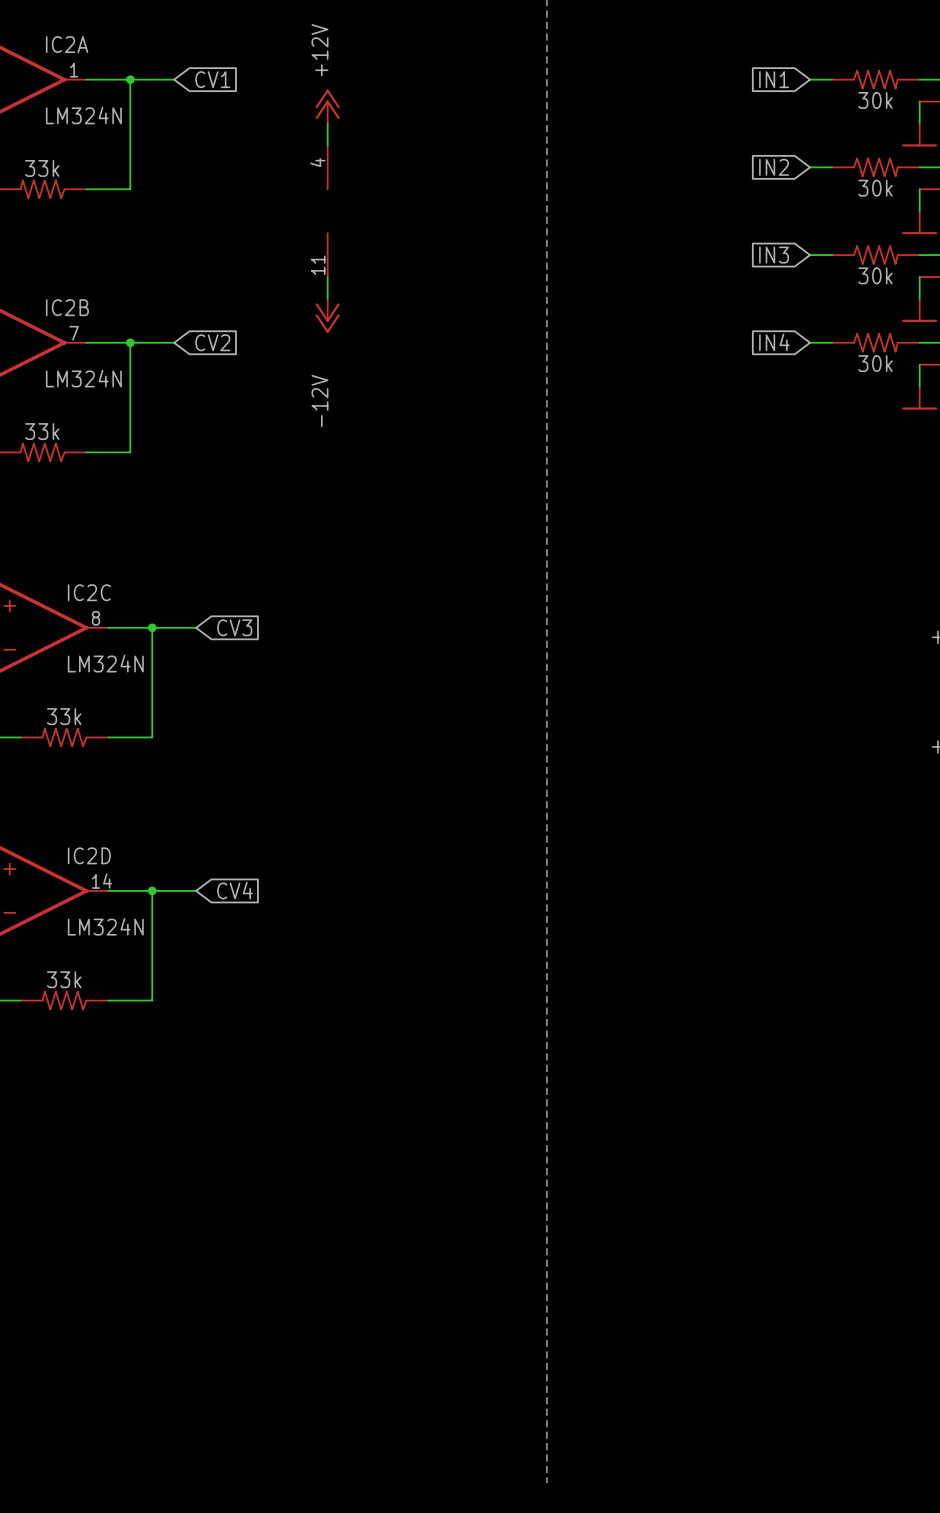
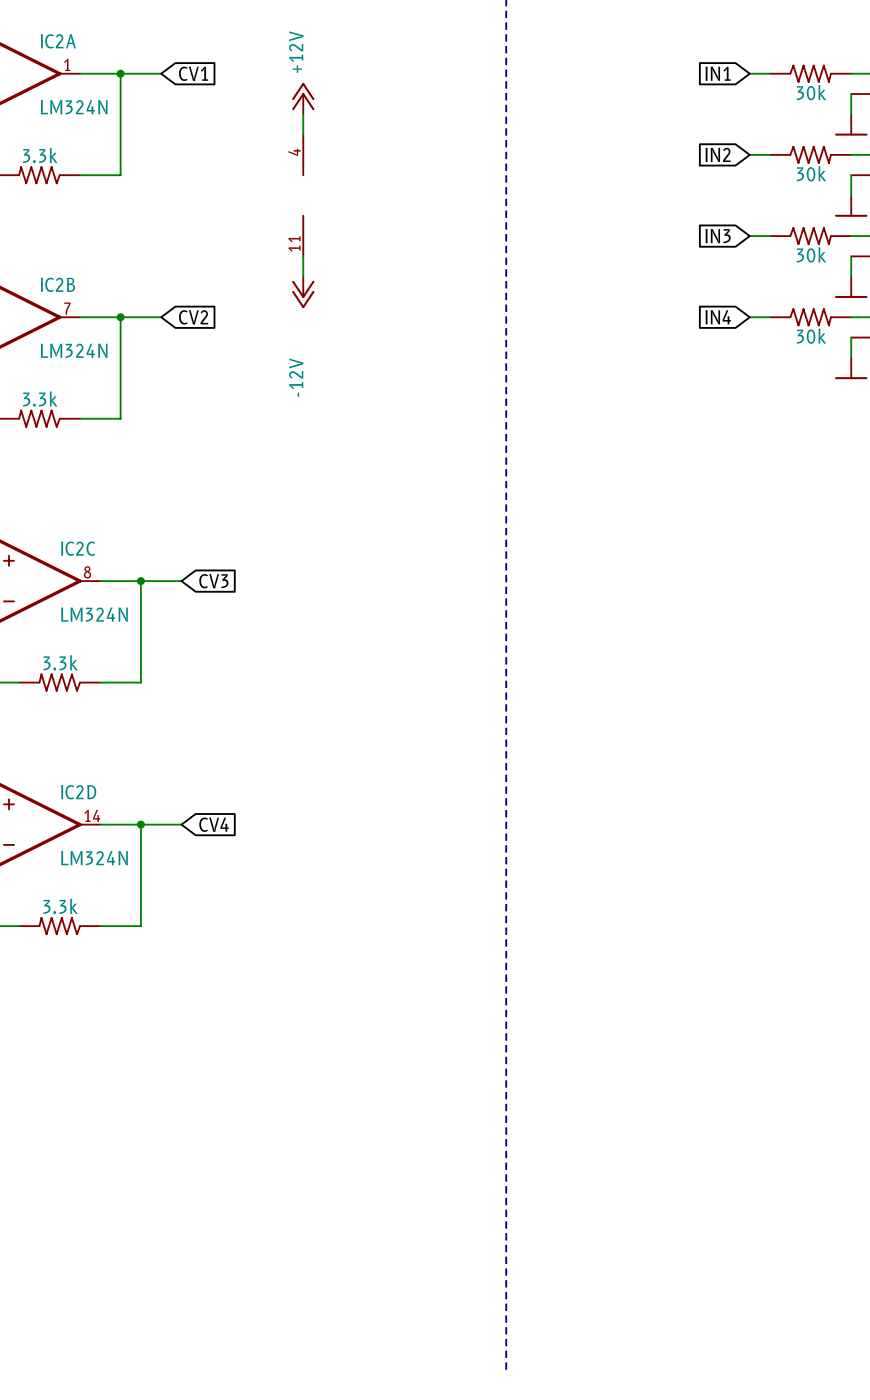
part value: 33k (42, 168) -> 3.3k (40, 155)
part value: 33k (42, 431) -> 3.3k (40, 399)
part value: 33k (64, 716) -> 3.3k (60, 662)
part value: 33k (64, 979) -> 3.3k (60, 906)

